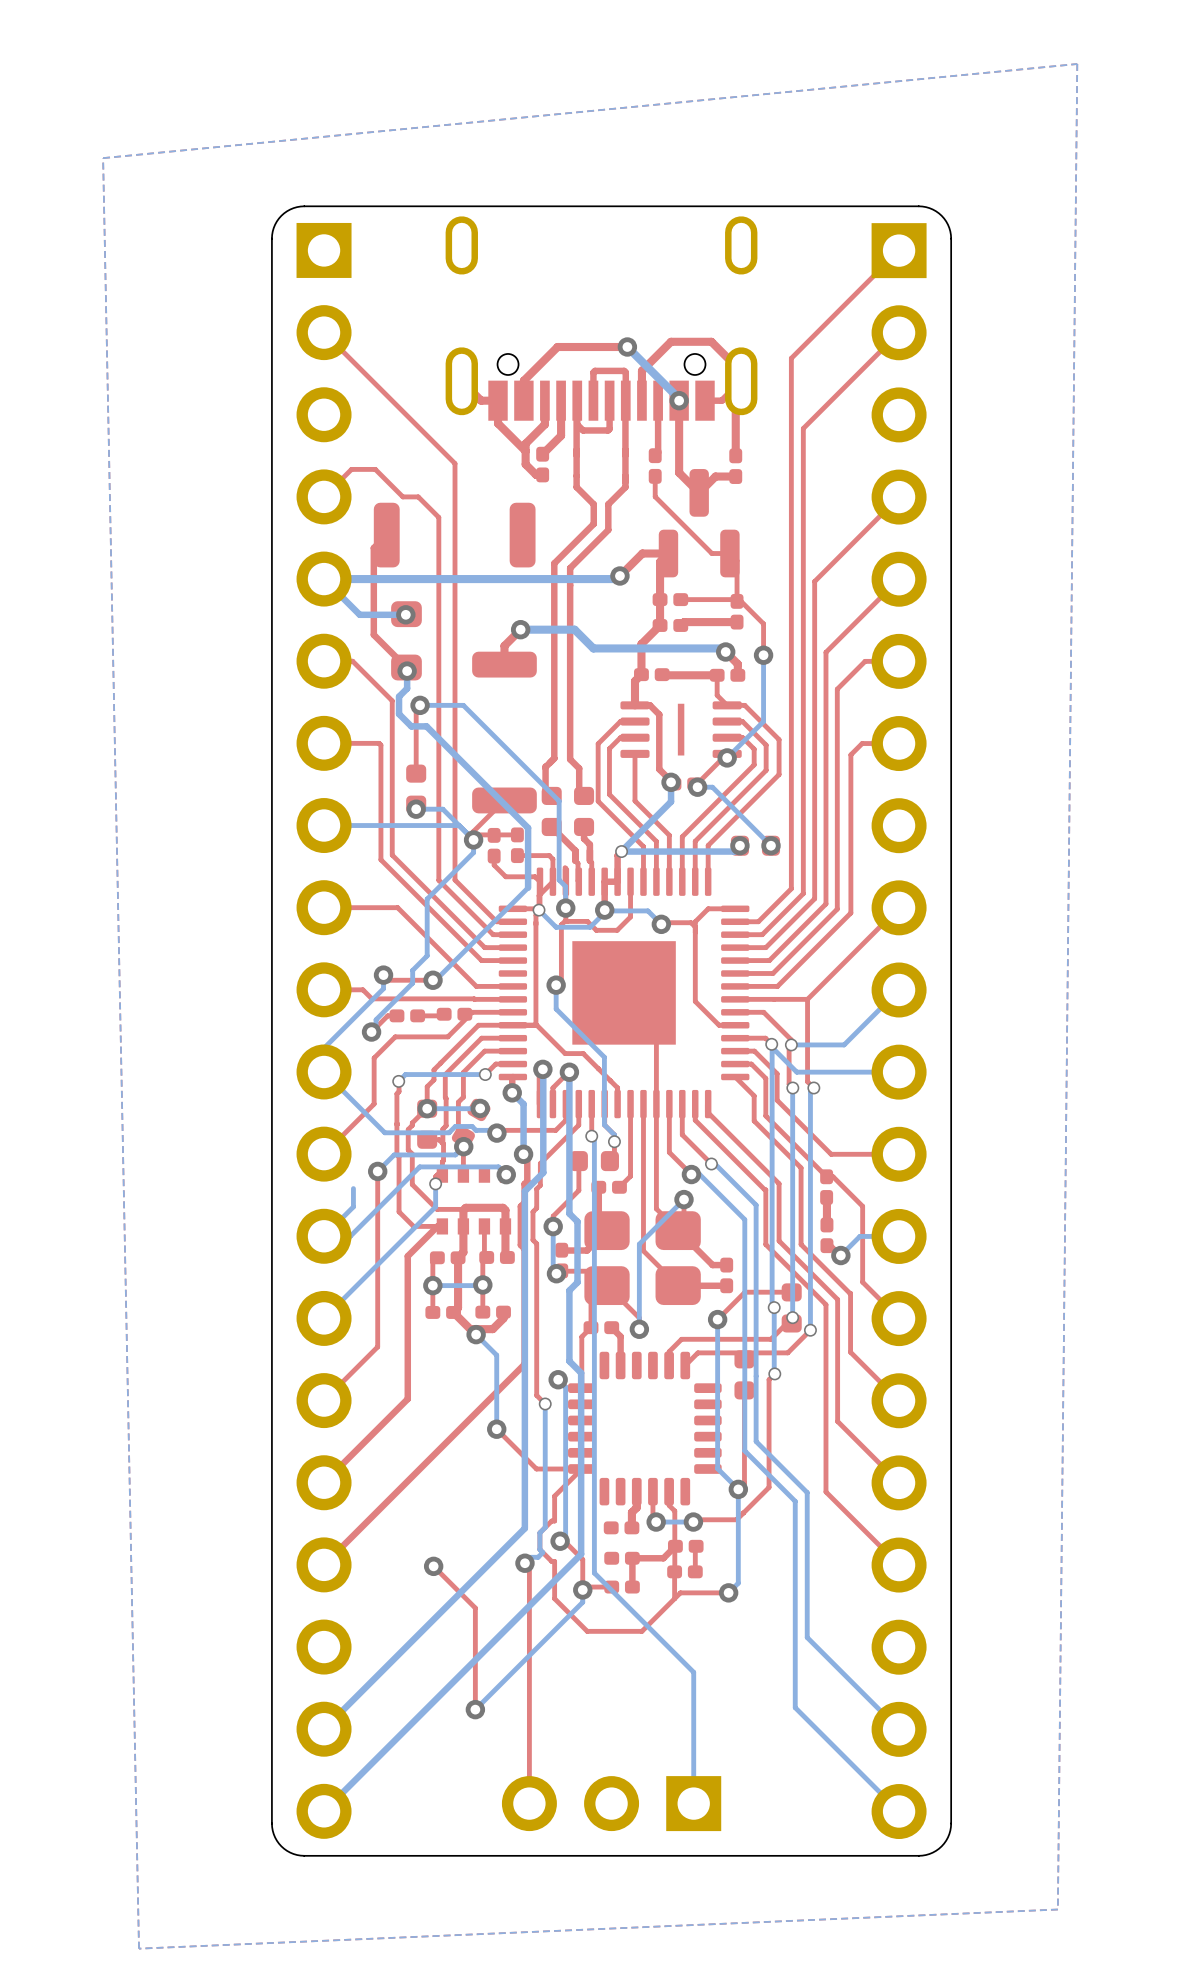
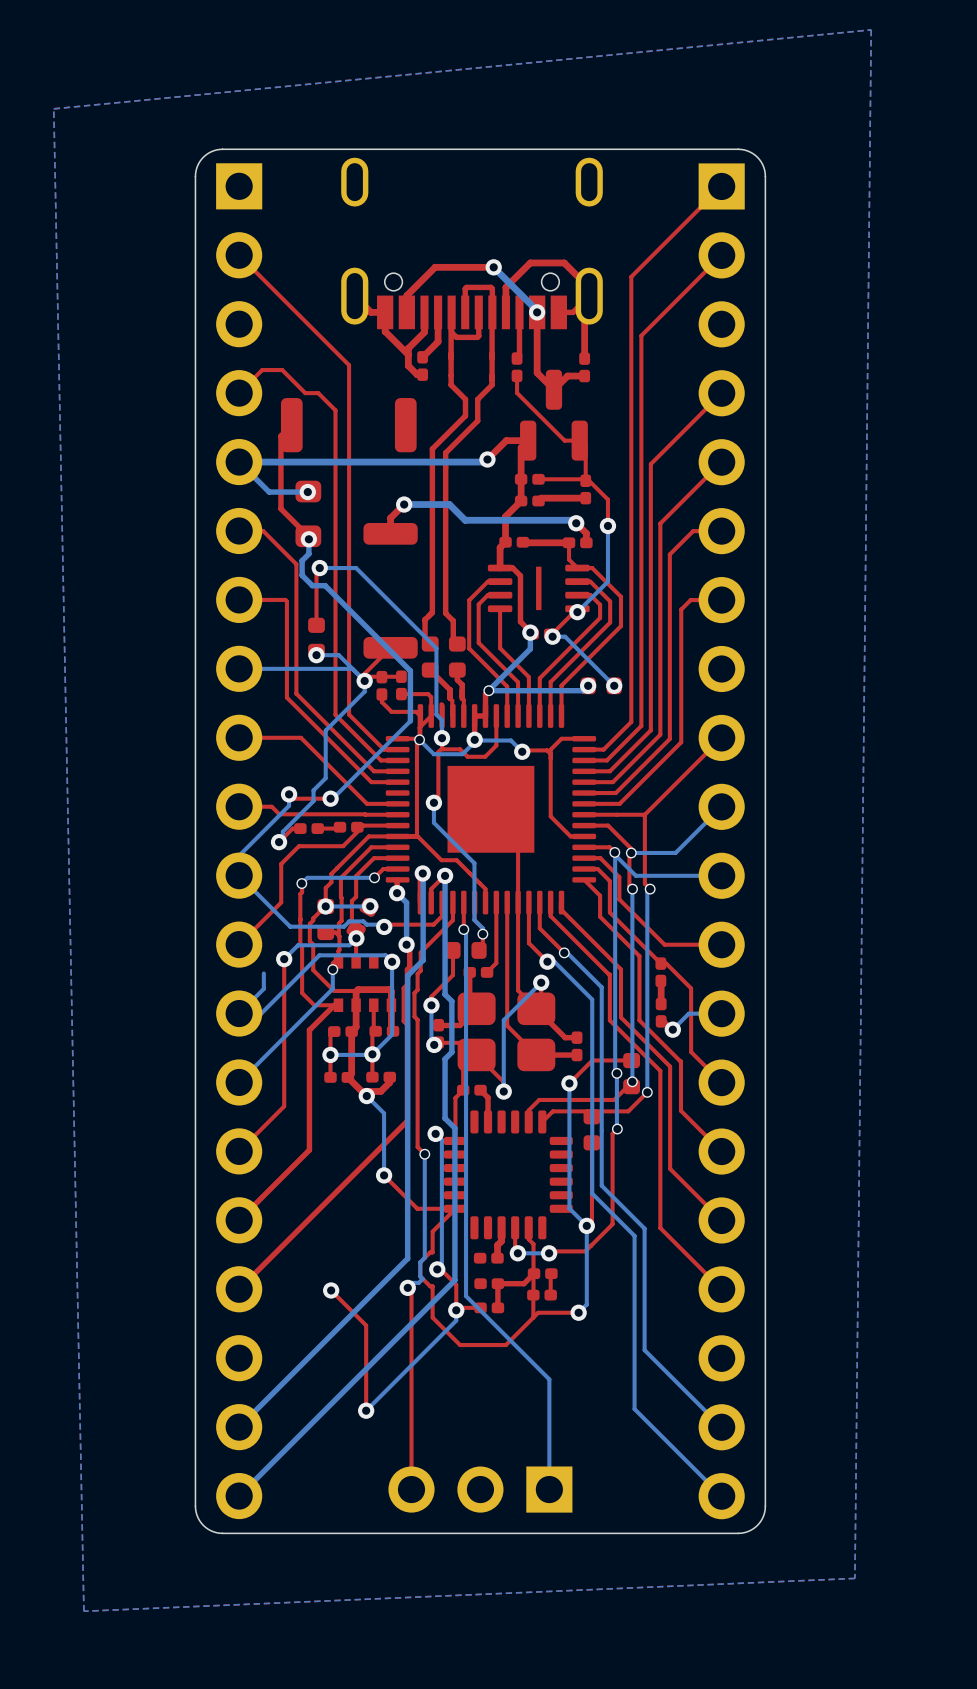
bottom track: none -> (392, 961) (392, 1034) (372, 1054)

